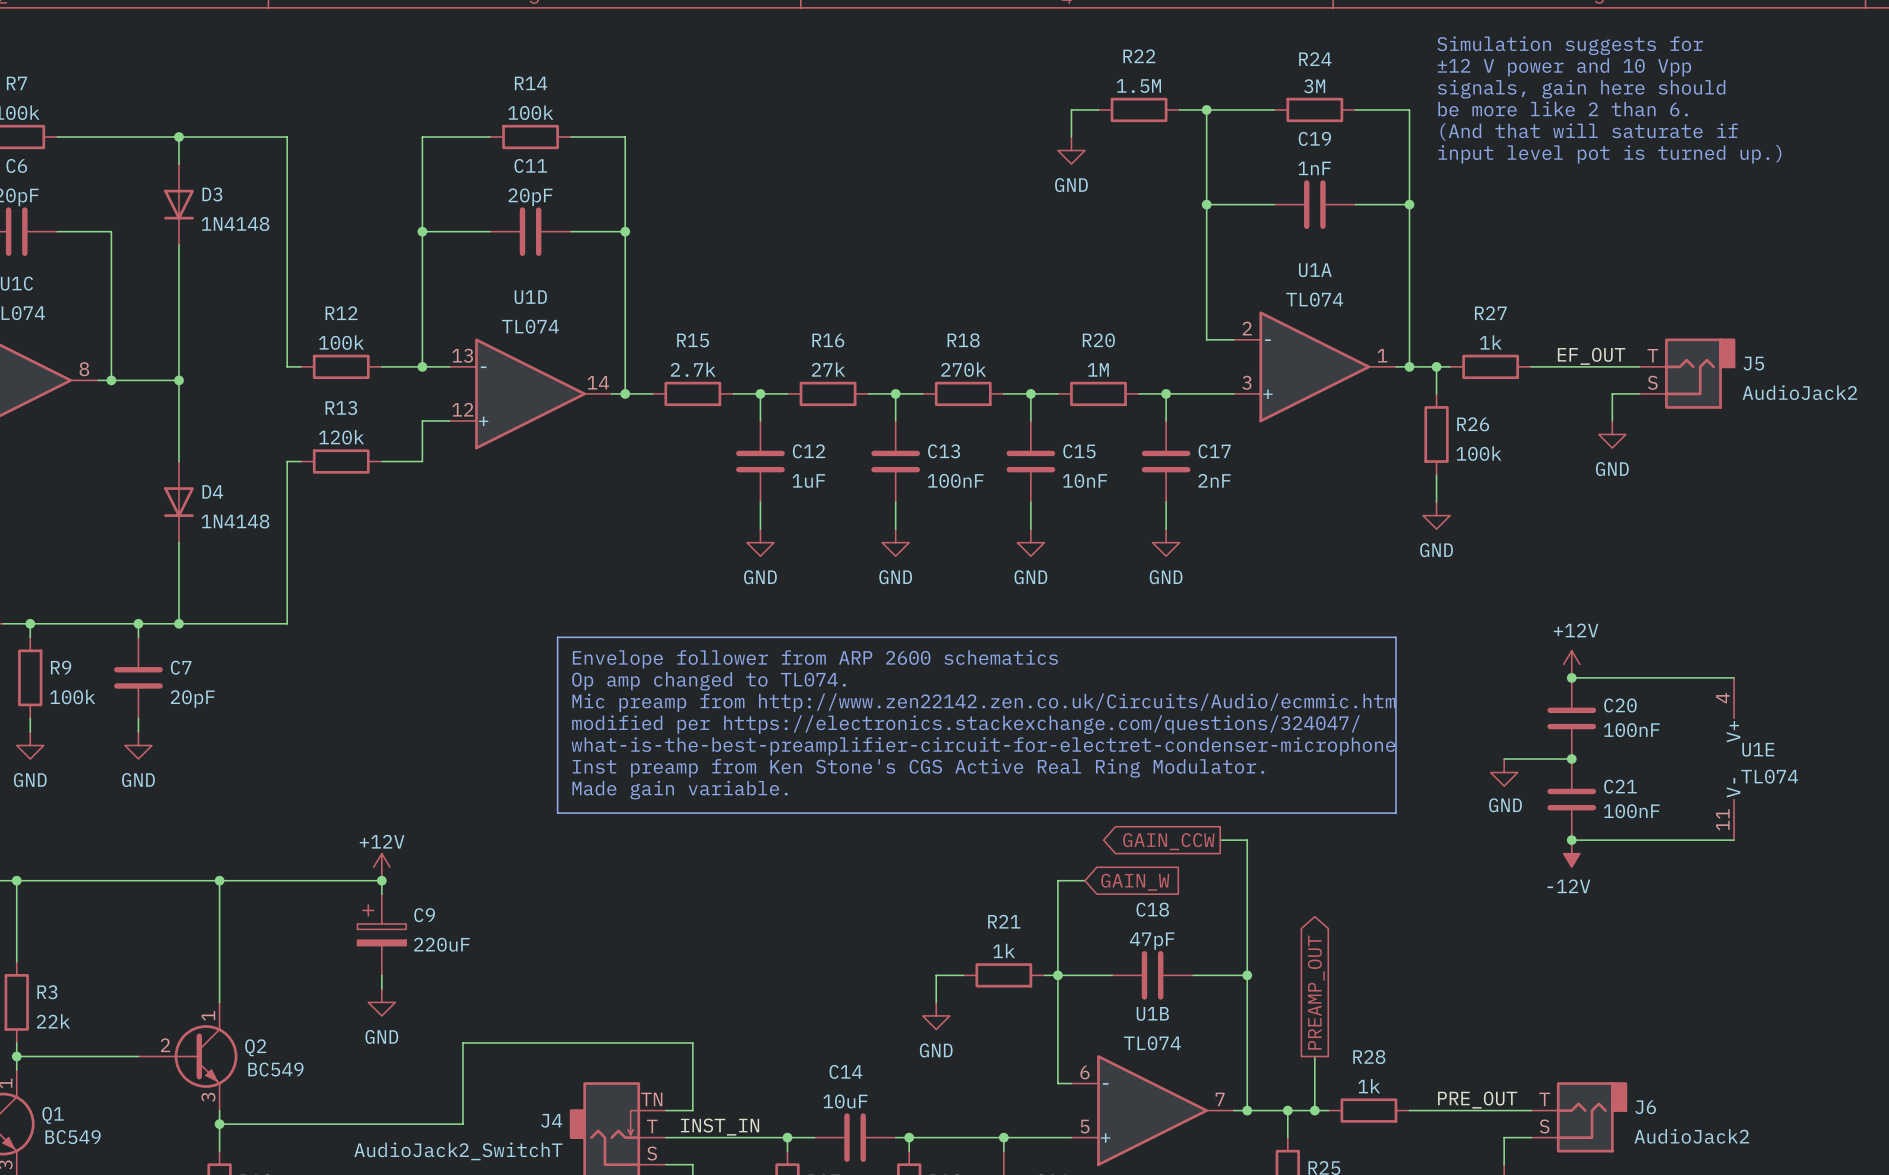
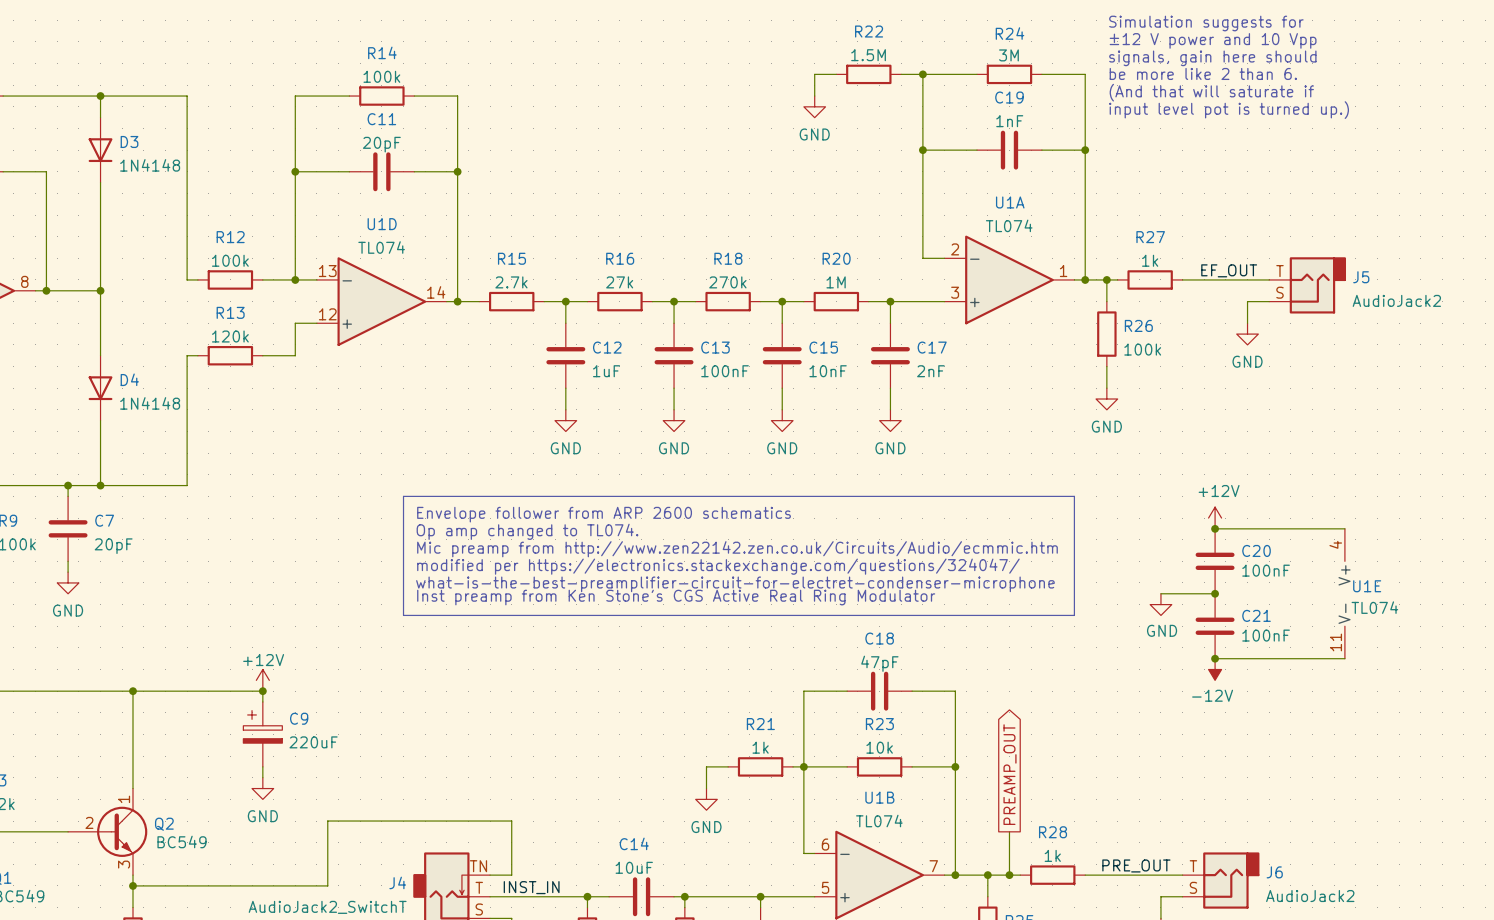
text: Inst preamp from Ken Stone's CGS Active Real Ring Modulator. (918, 768) -> Inst preamp from Ken Stone's CGS Active Real Ring Modulator (676, 597)
line: (557, 786) (557, 813) (1395, 813) (1395, 786) -> (403, 615) (1074, 615)
text: Made gain variable. (680, 790) -> none
wire: (1220, 840) (1247, 840) (1247, 880) -> (912, 691) (955, 691)
global label: GAIN_CCW (1168, 841) -> none
wire: none -> (825, 691) (847, 691)
global label: GAIN_W (1135, 882) -> none
C18 position: (1152, 975) -> (879, 691)
R23: none -> 10k (879, 766)

